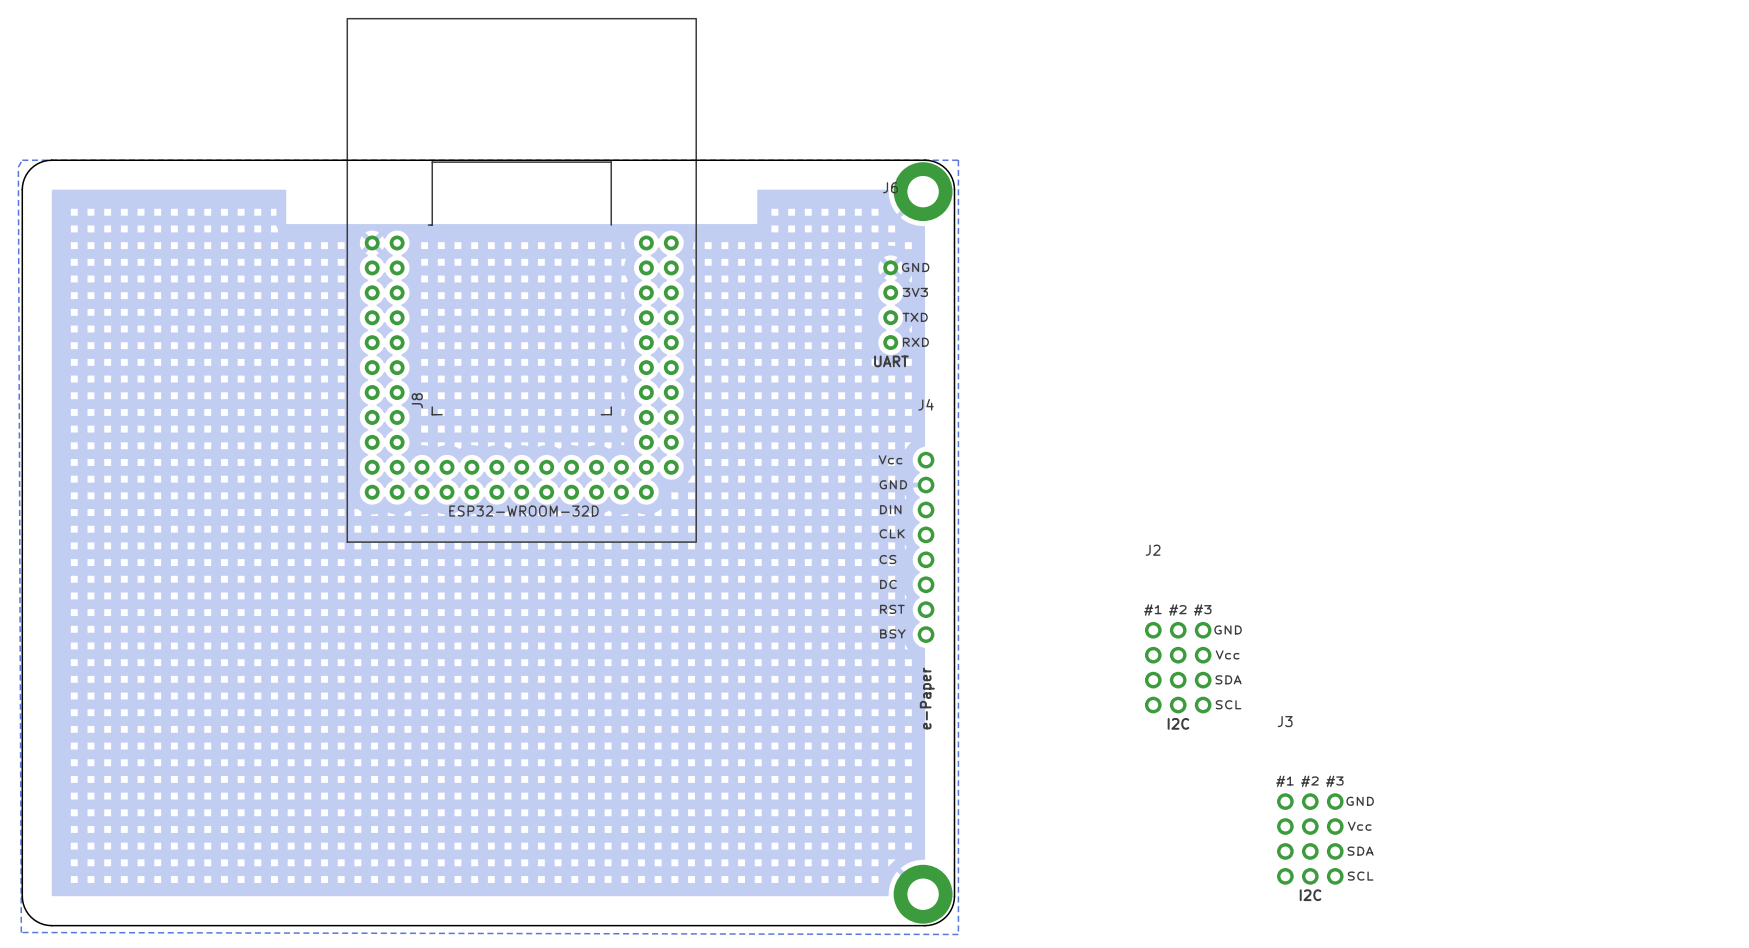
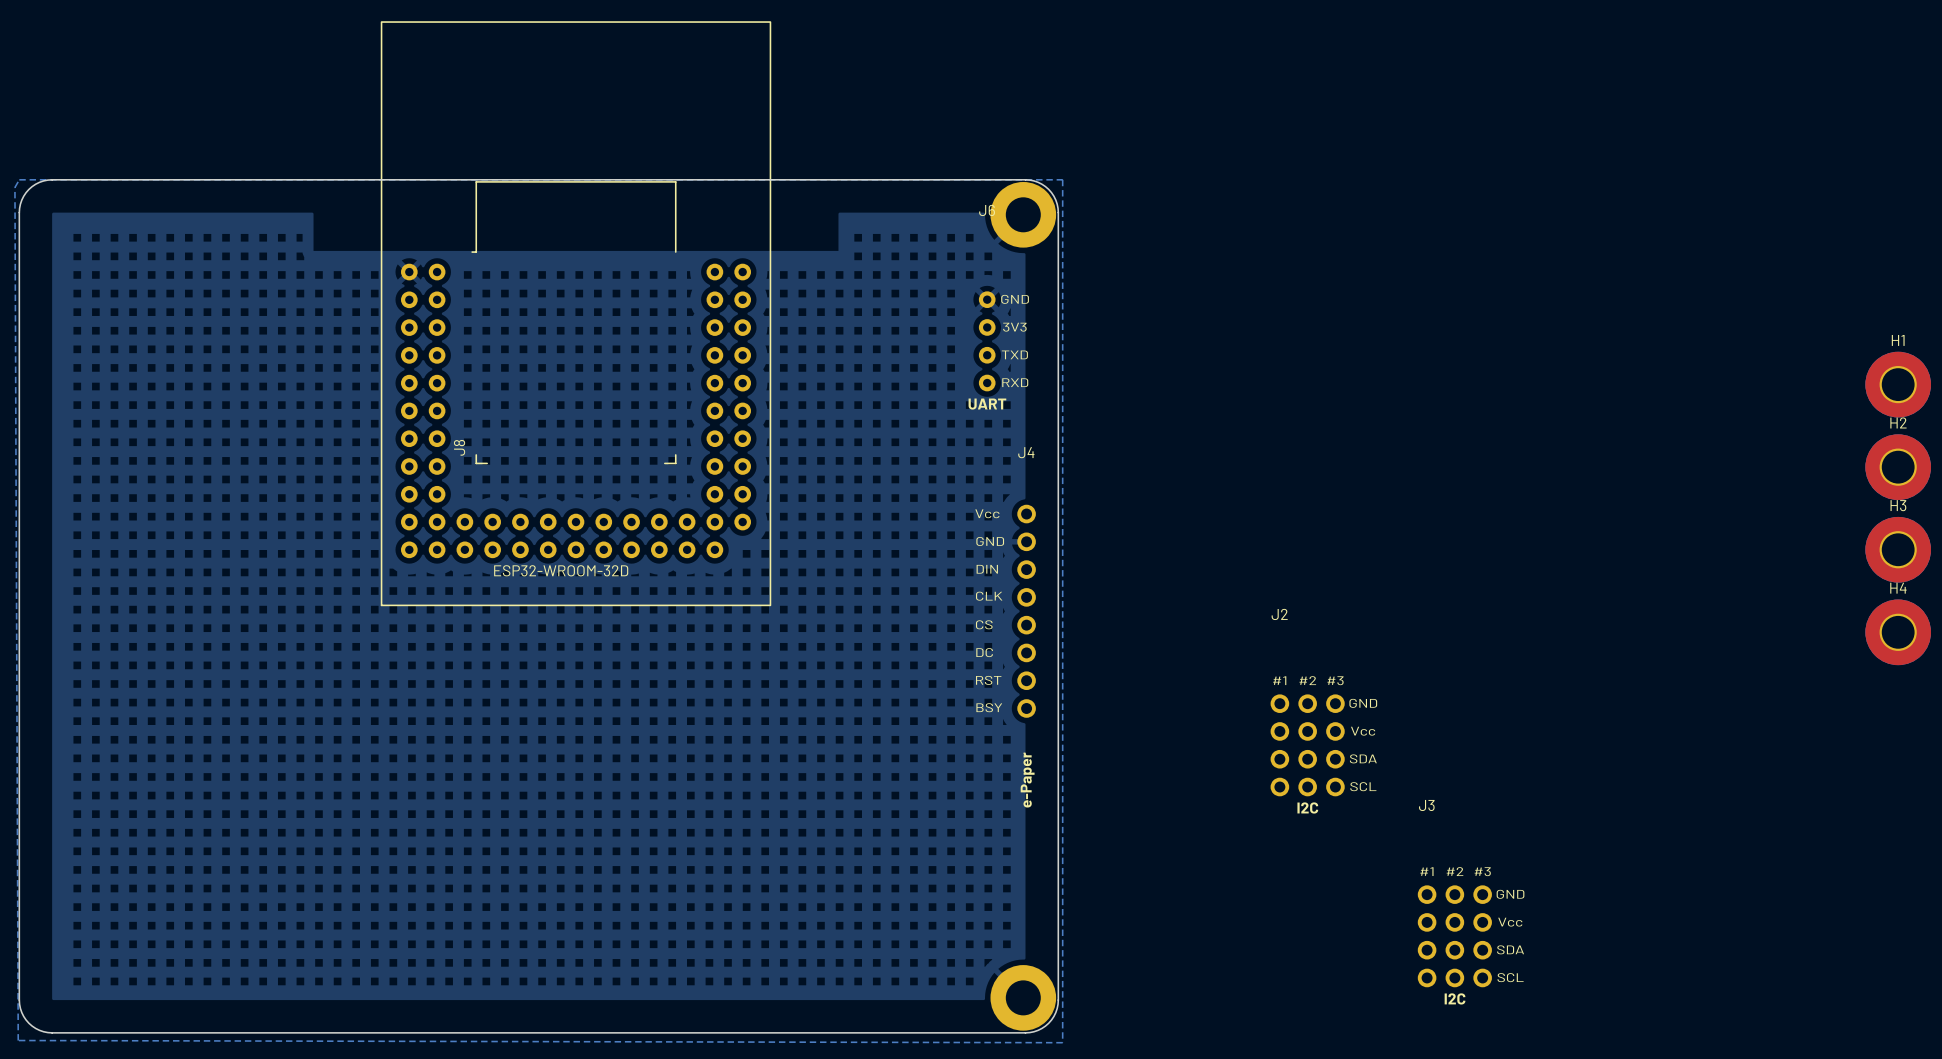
H1: none -> (1898, 384)
H2: none -> (1898, 467)
H3: none -> (1898, 549)
H4: none -> (1898, 632)

